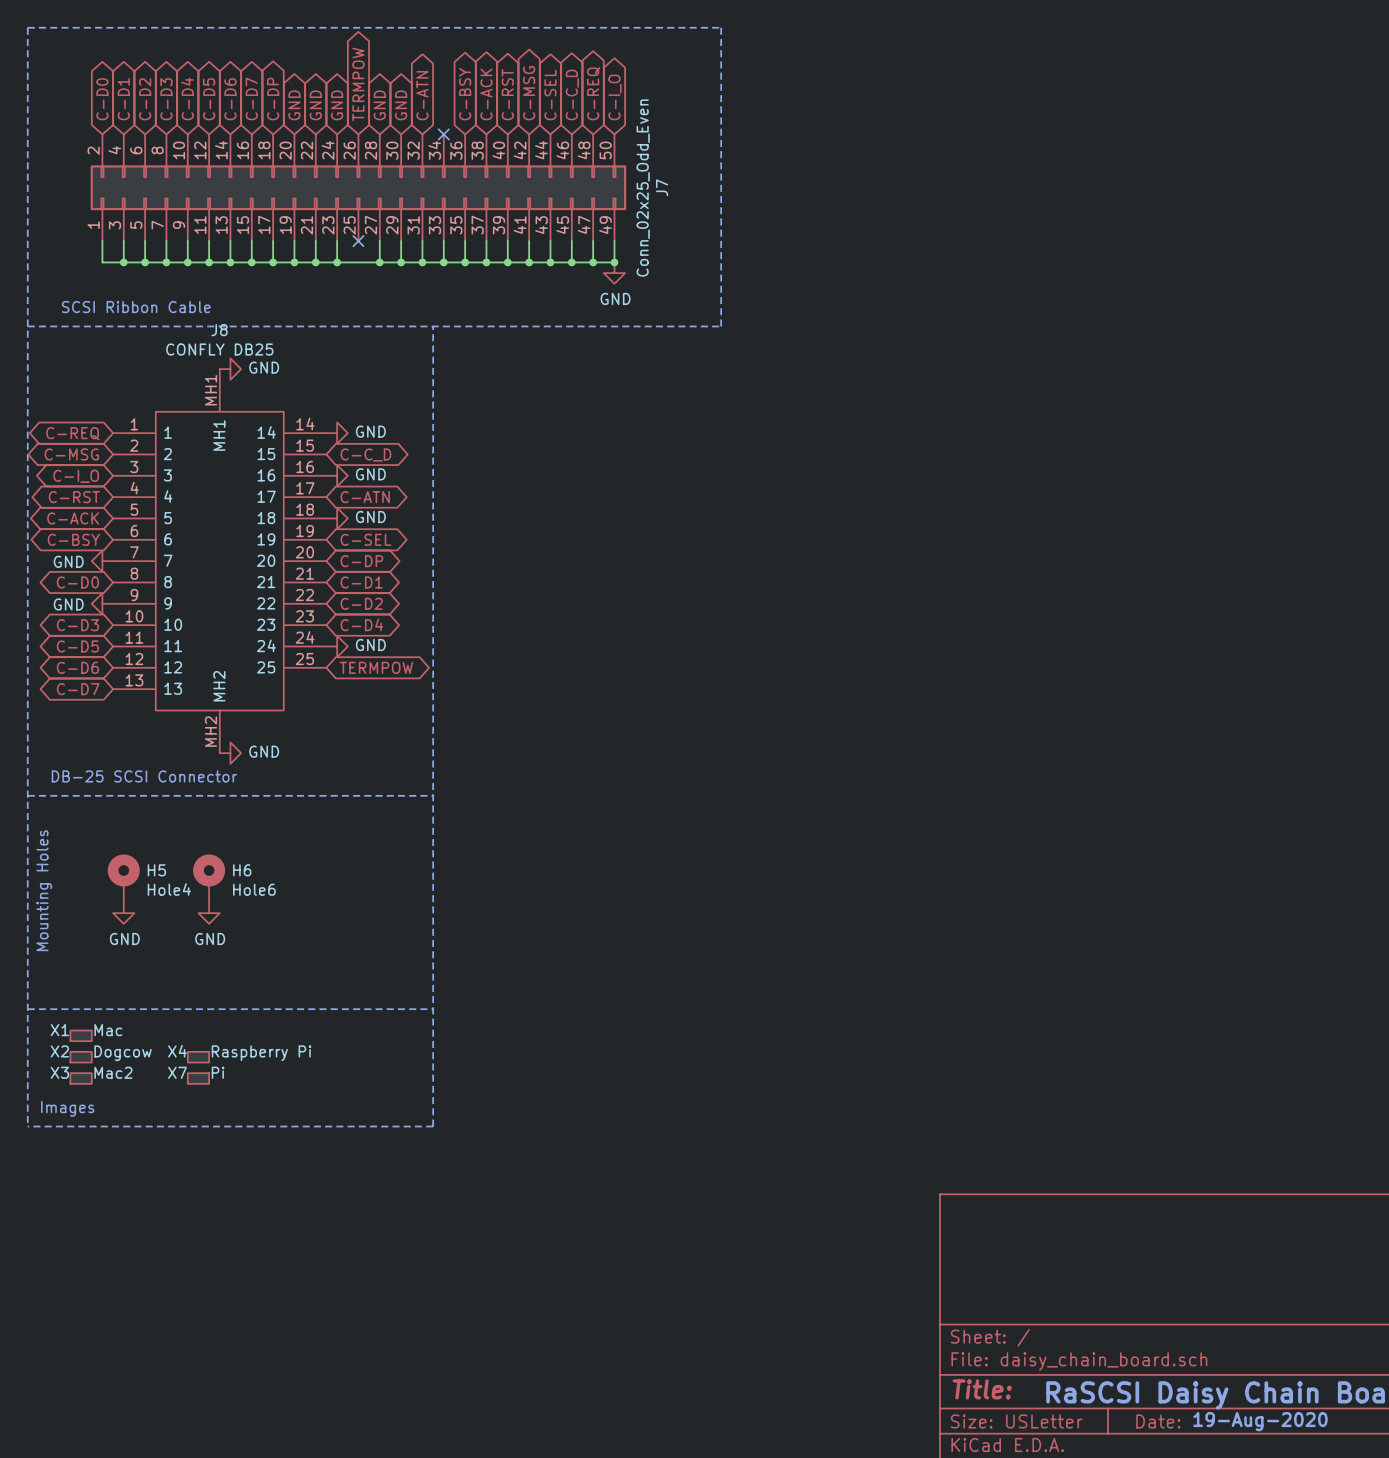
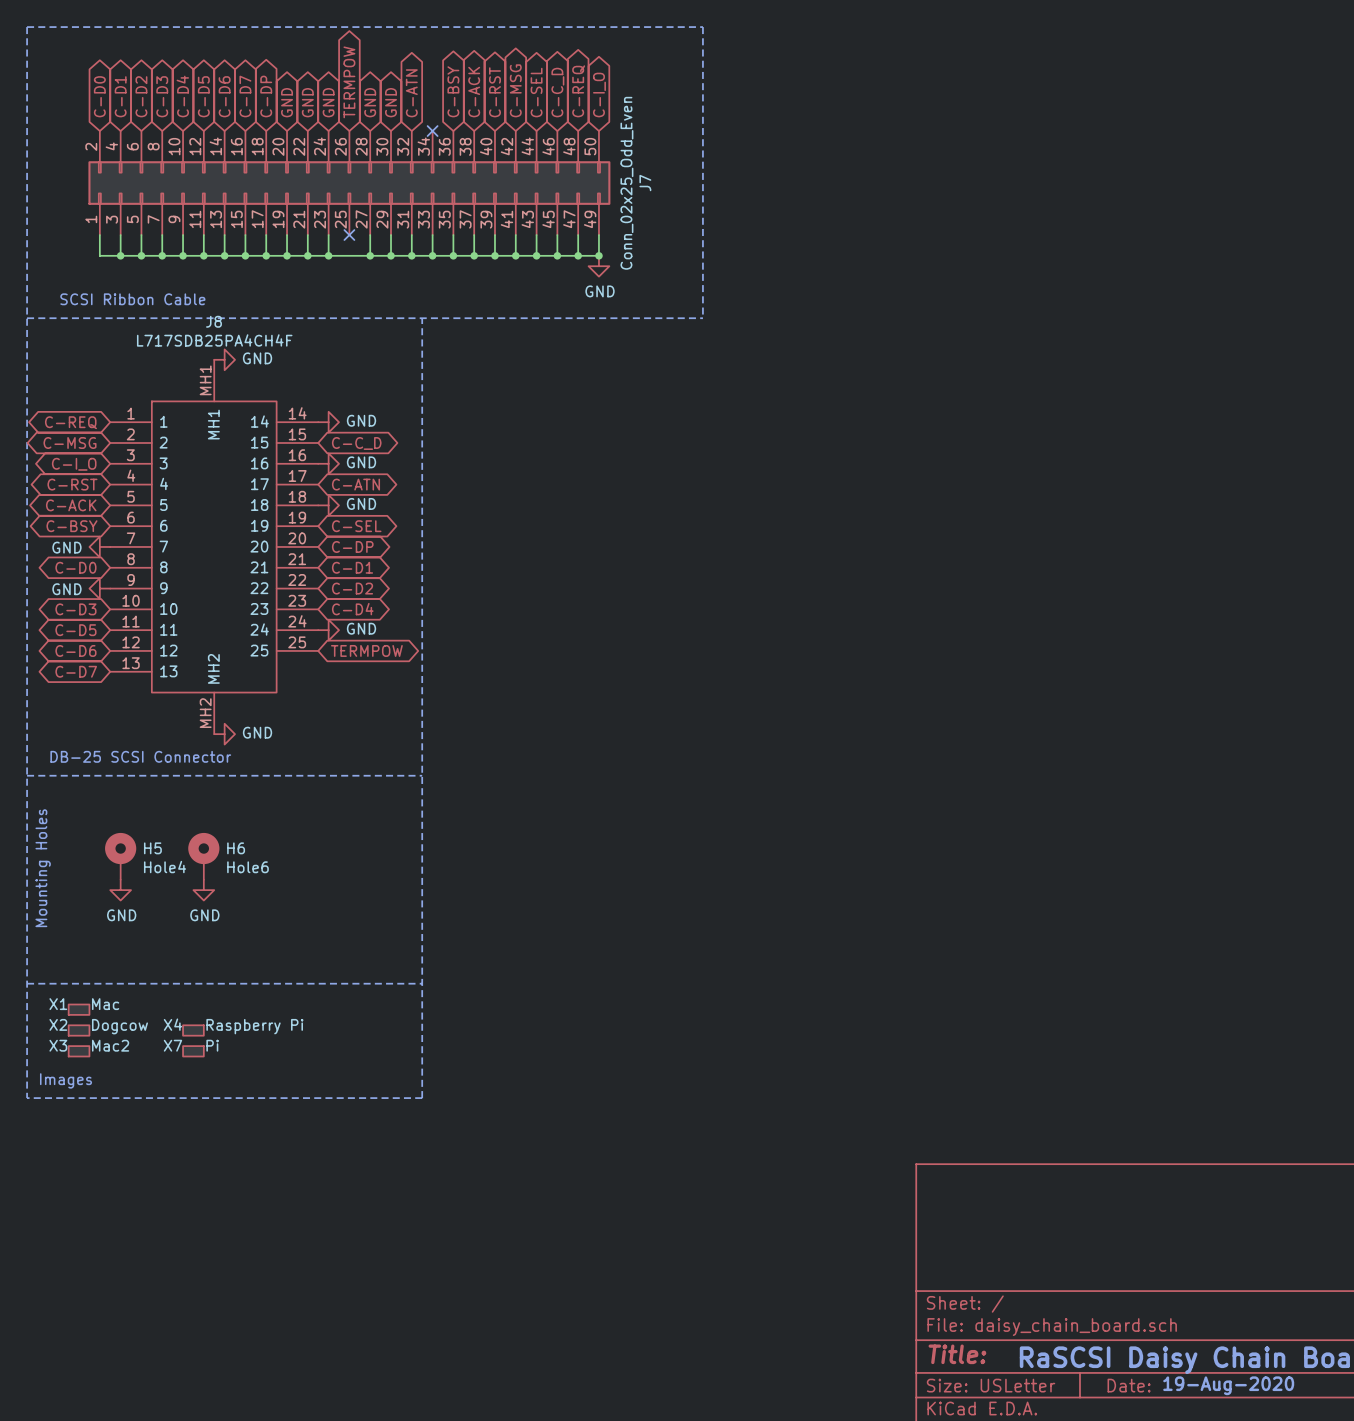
J8 value: CONFLY DB25 (219, 349) -> L717SDB25PA4CH4F (214, 340)

